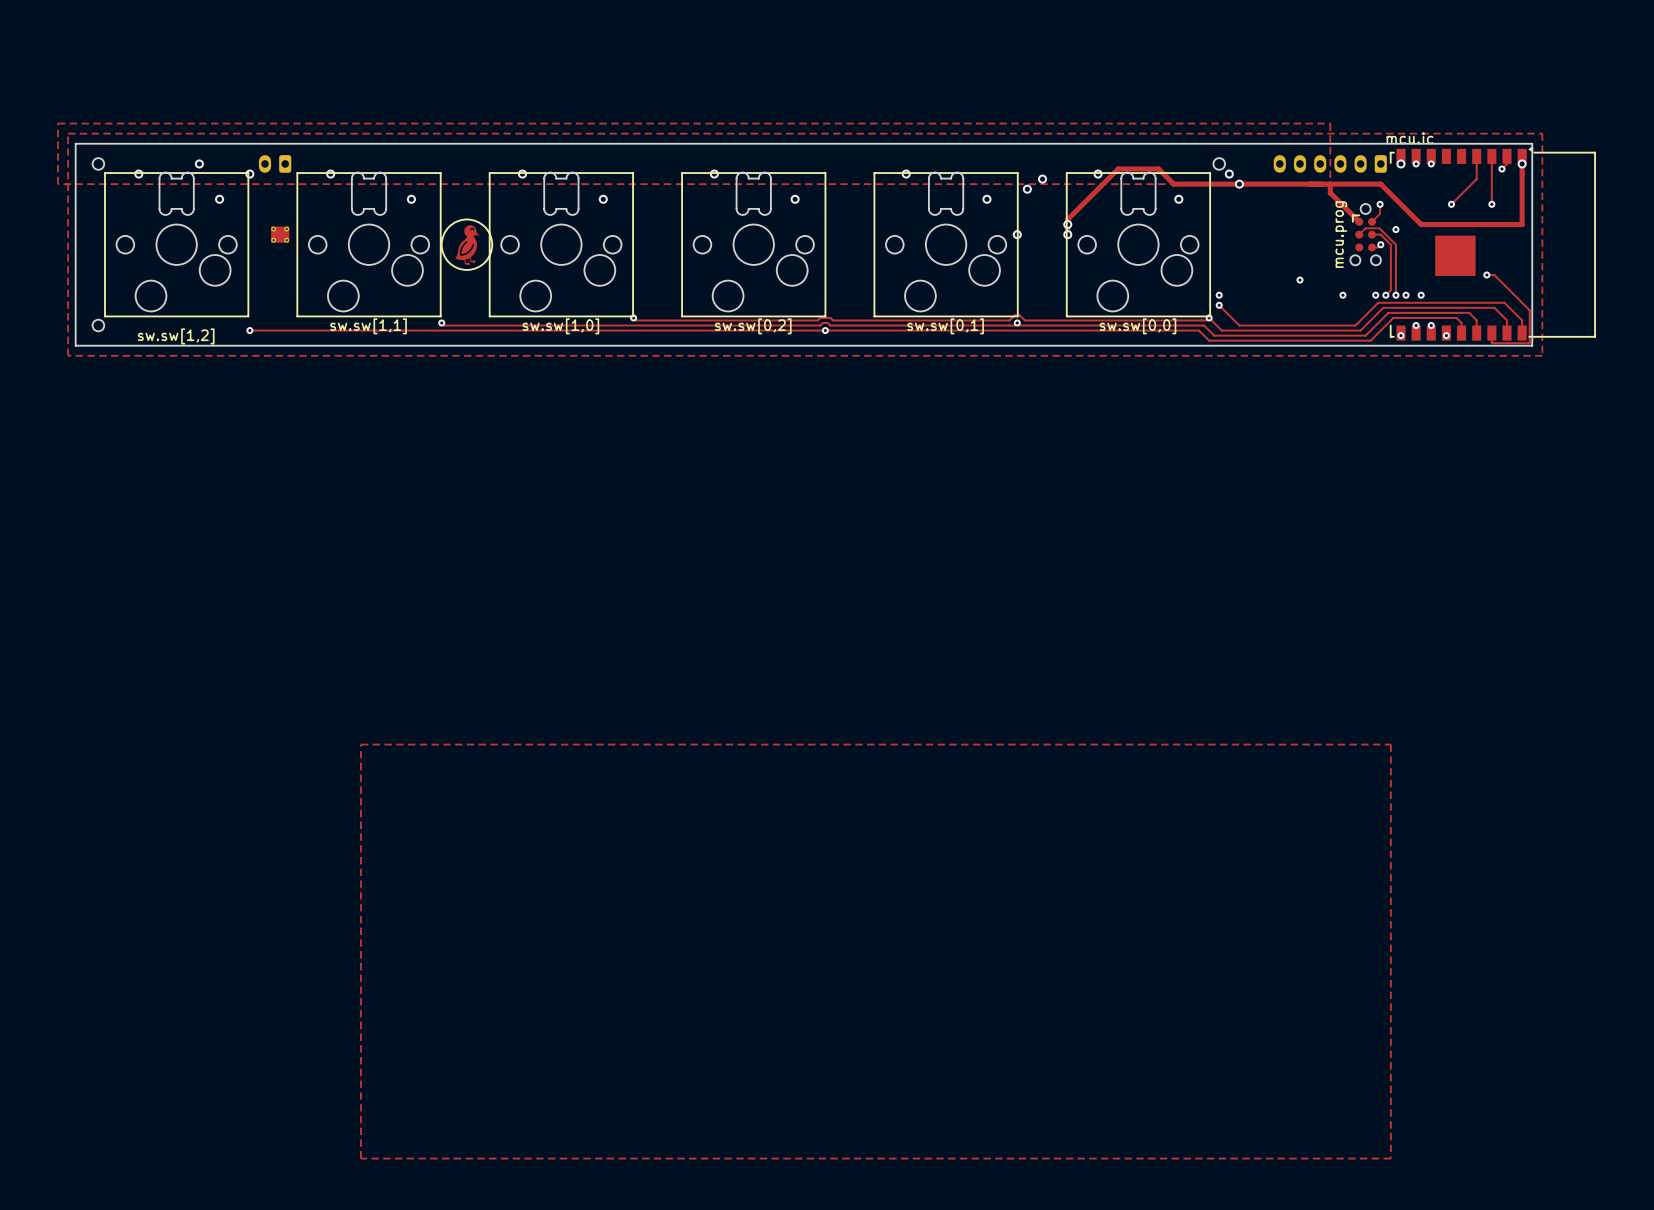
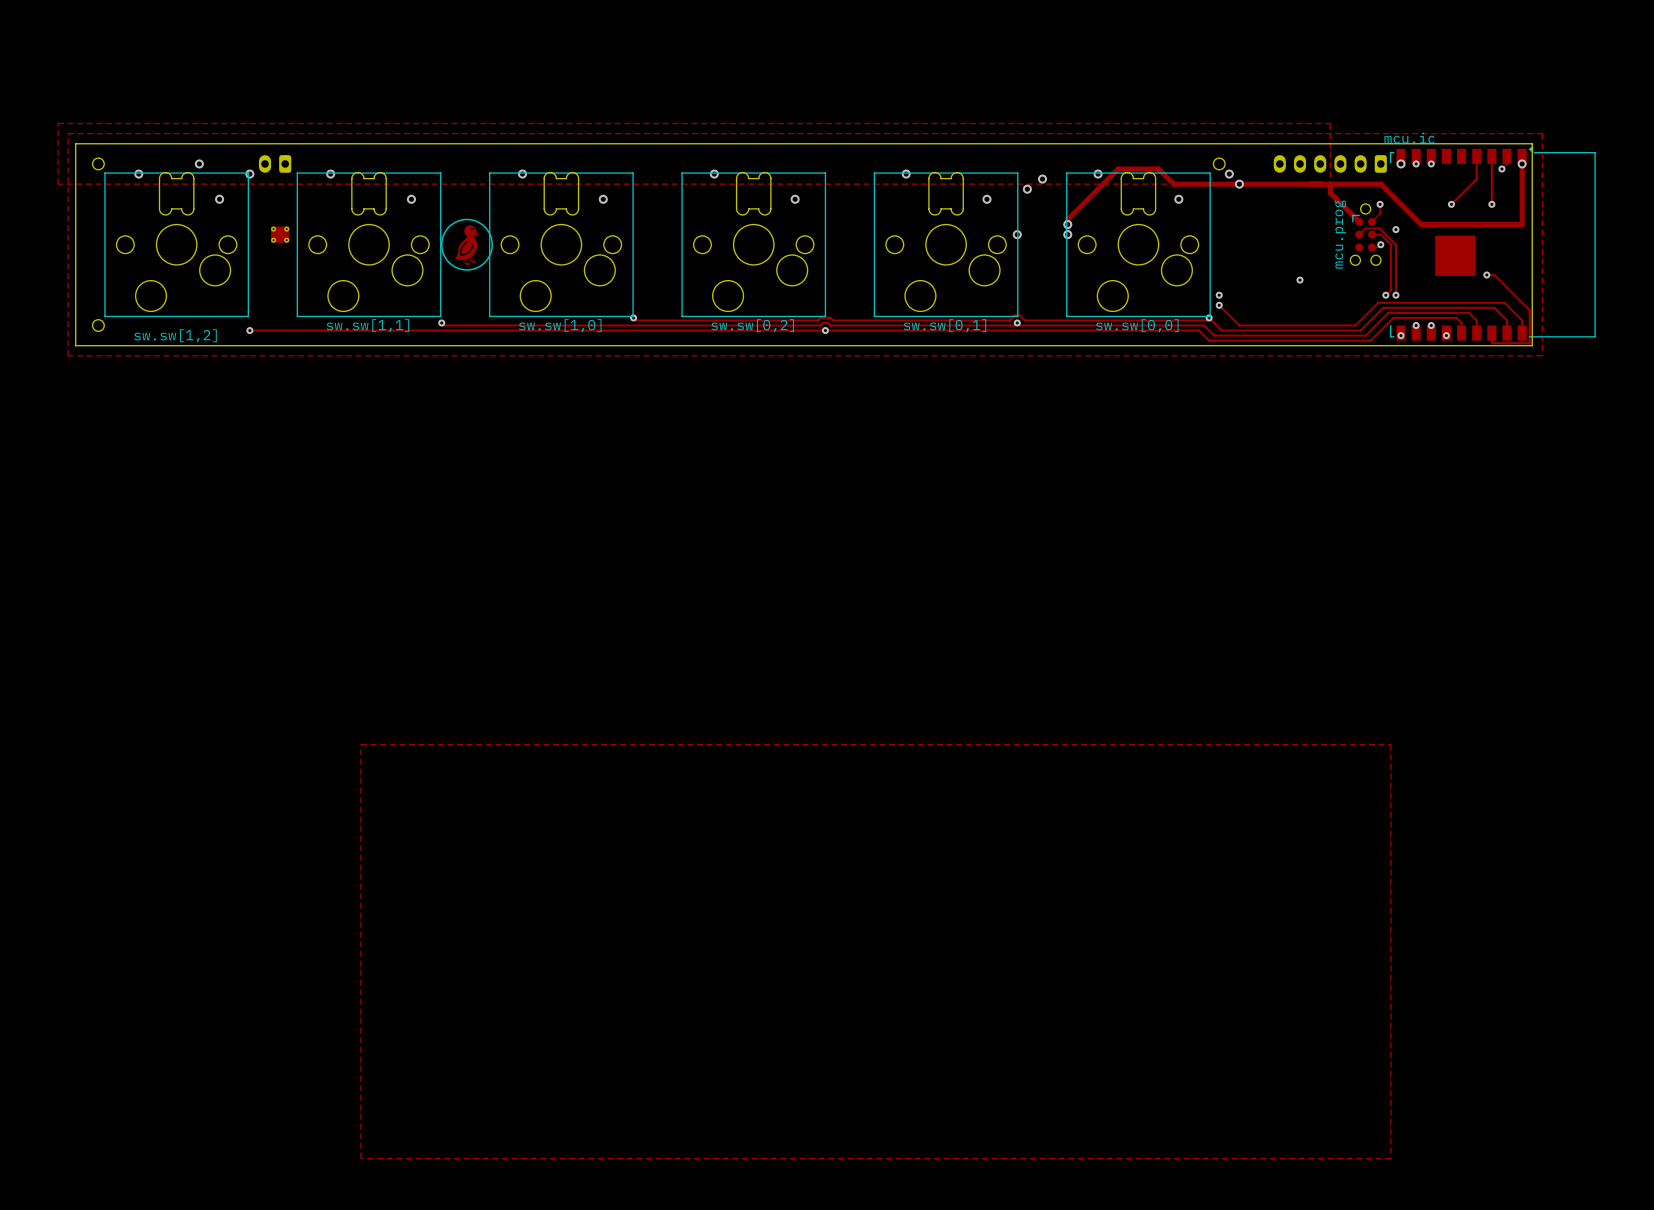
via: (1342, 295) -> none
via: (1375, 295) -> none
via: (1406, 295) -> none
via: (1421, 295) -> none

